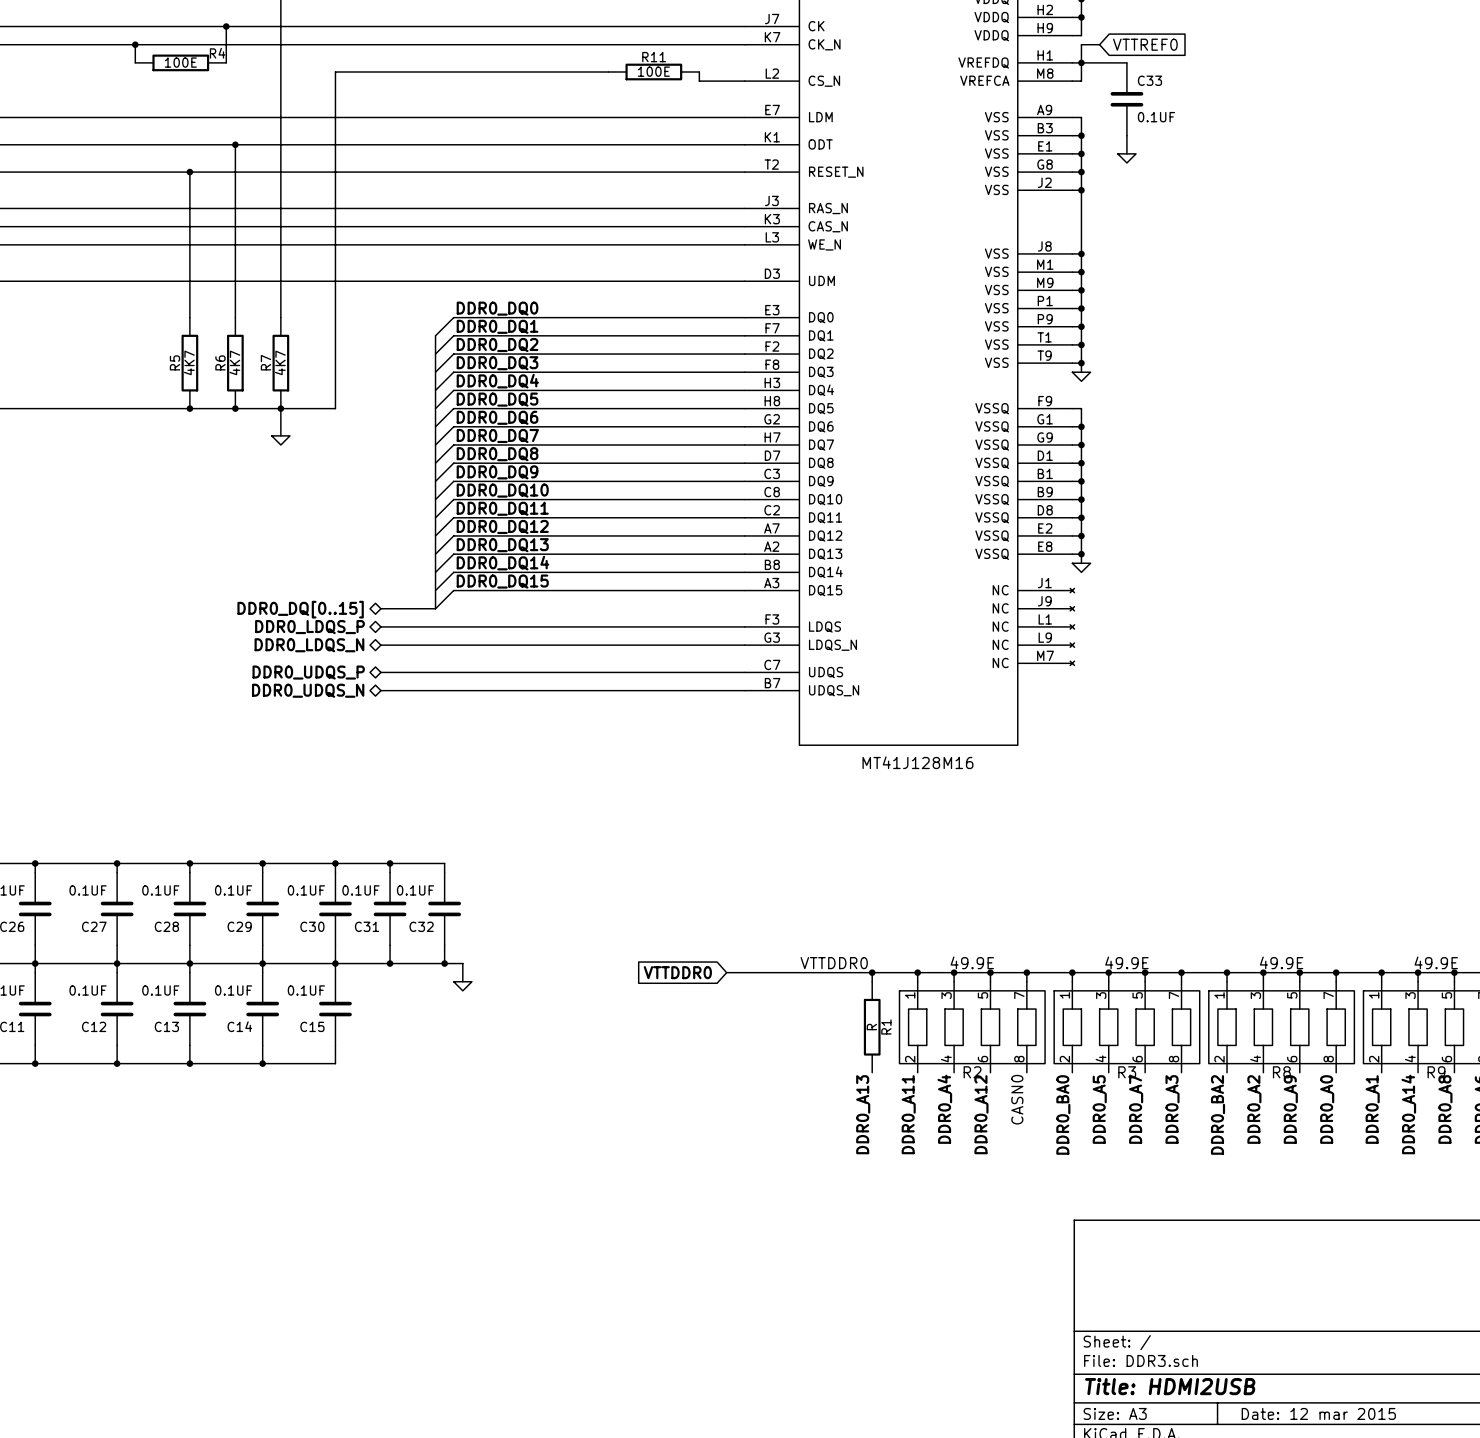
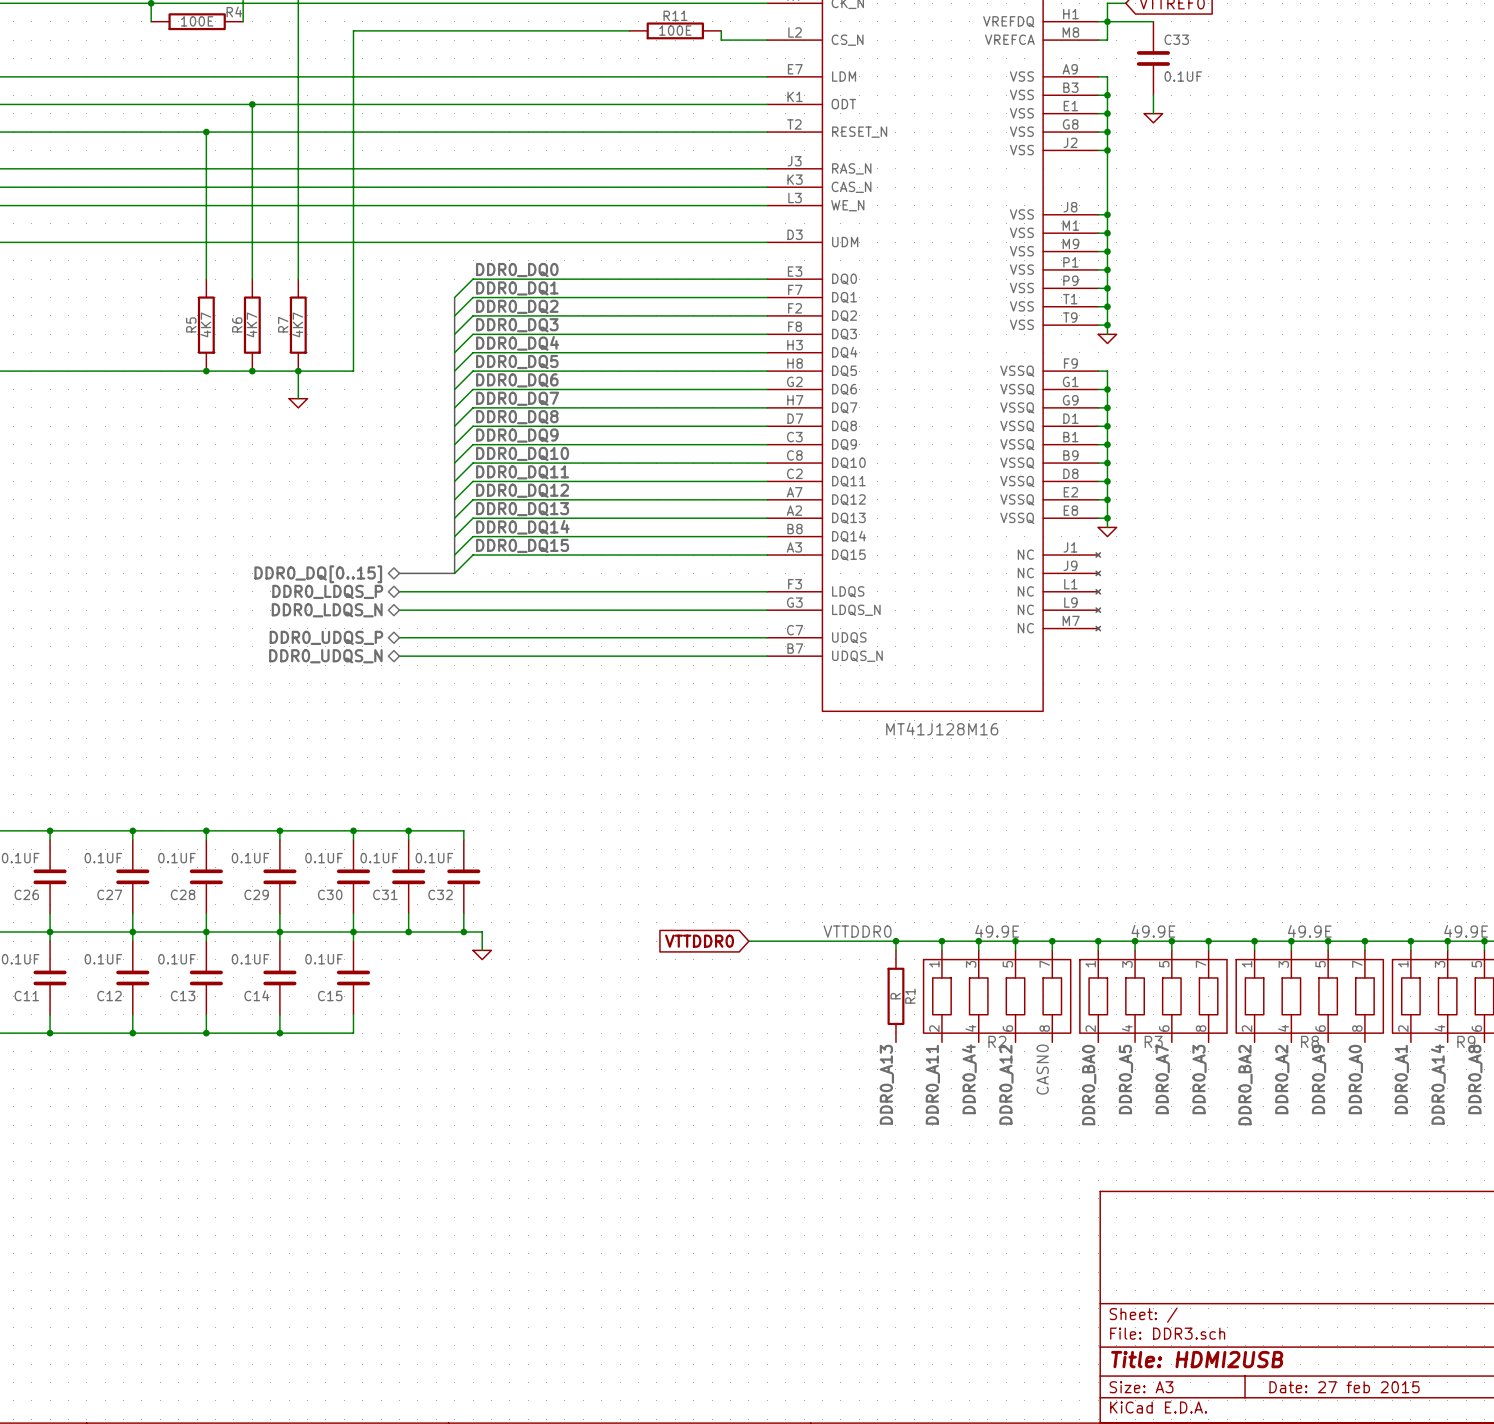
title block: Date: 12 mar 2015 (1318, 1413) -> Date: 27 feb 2015 (1344, 1387)

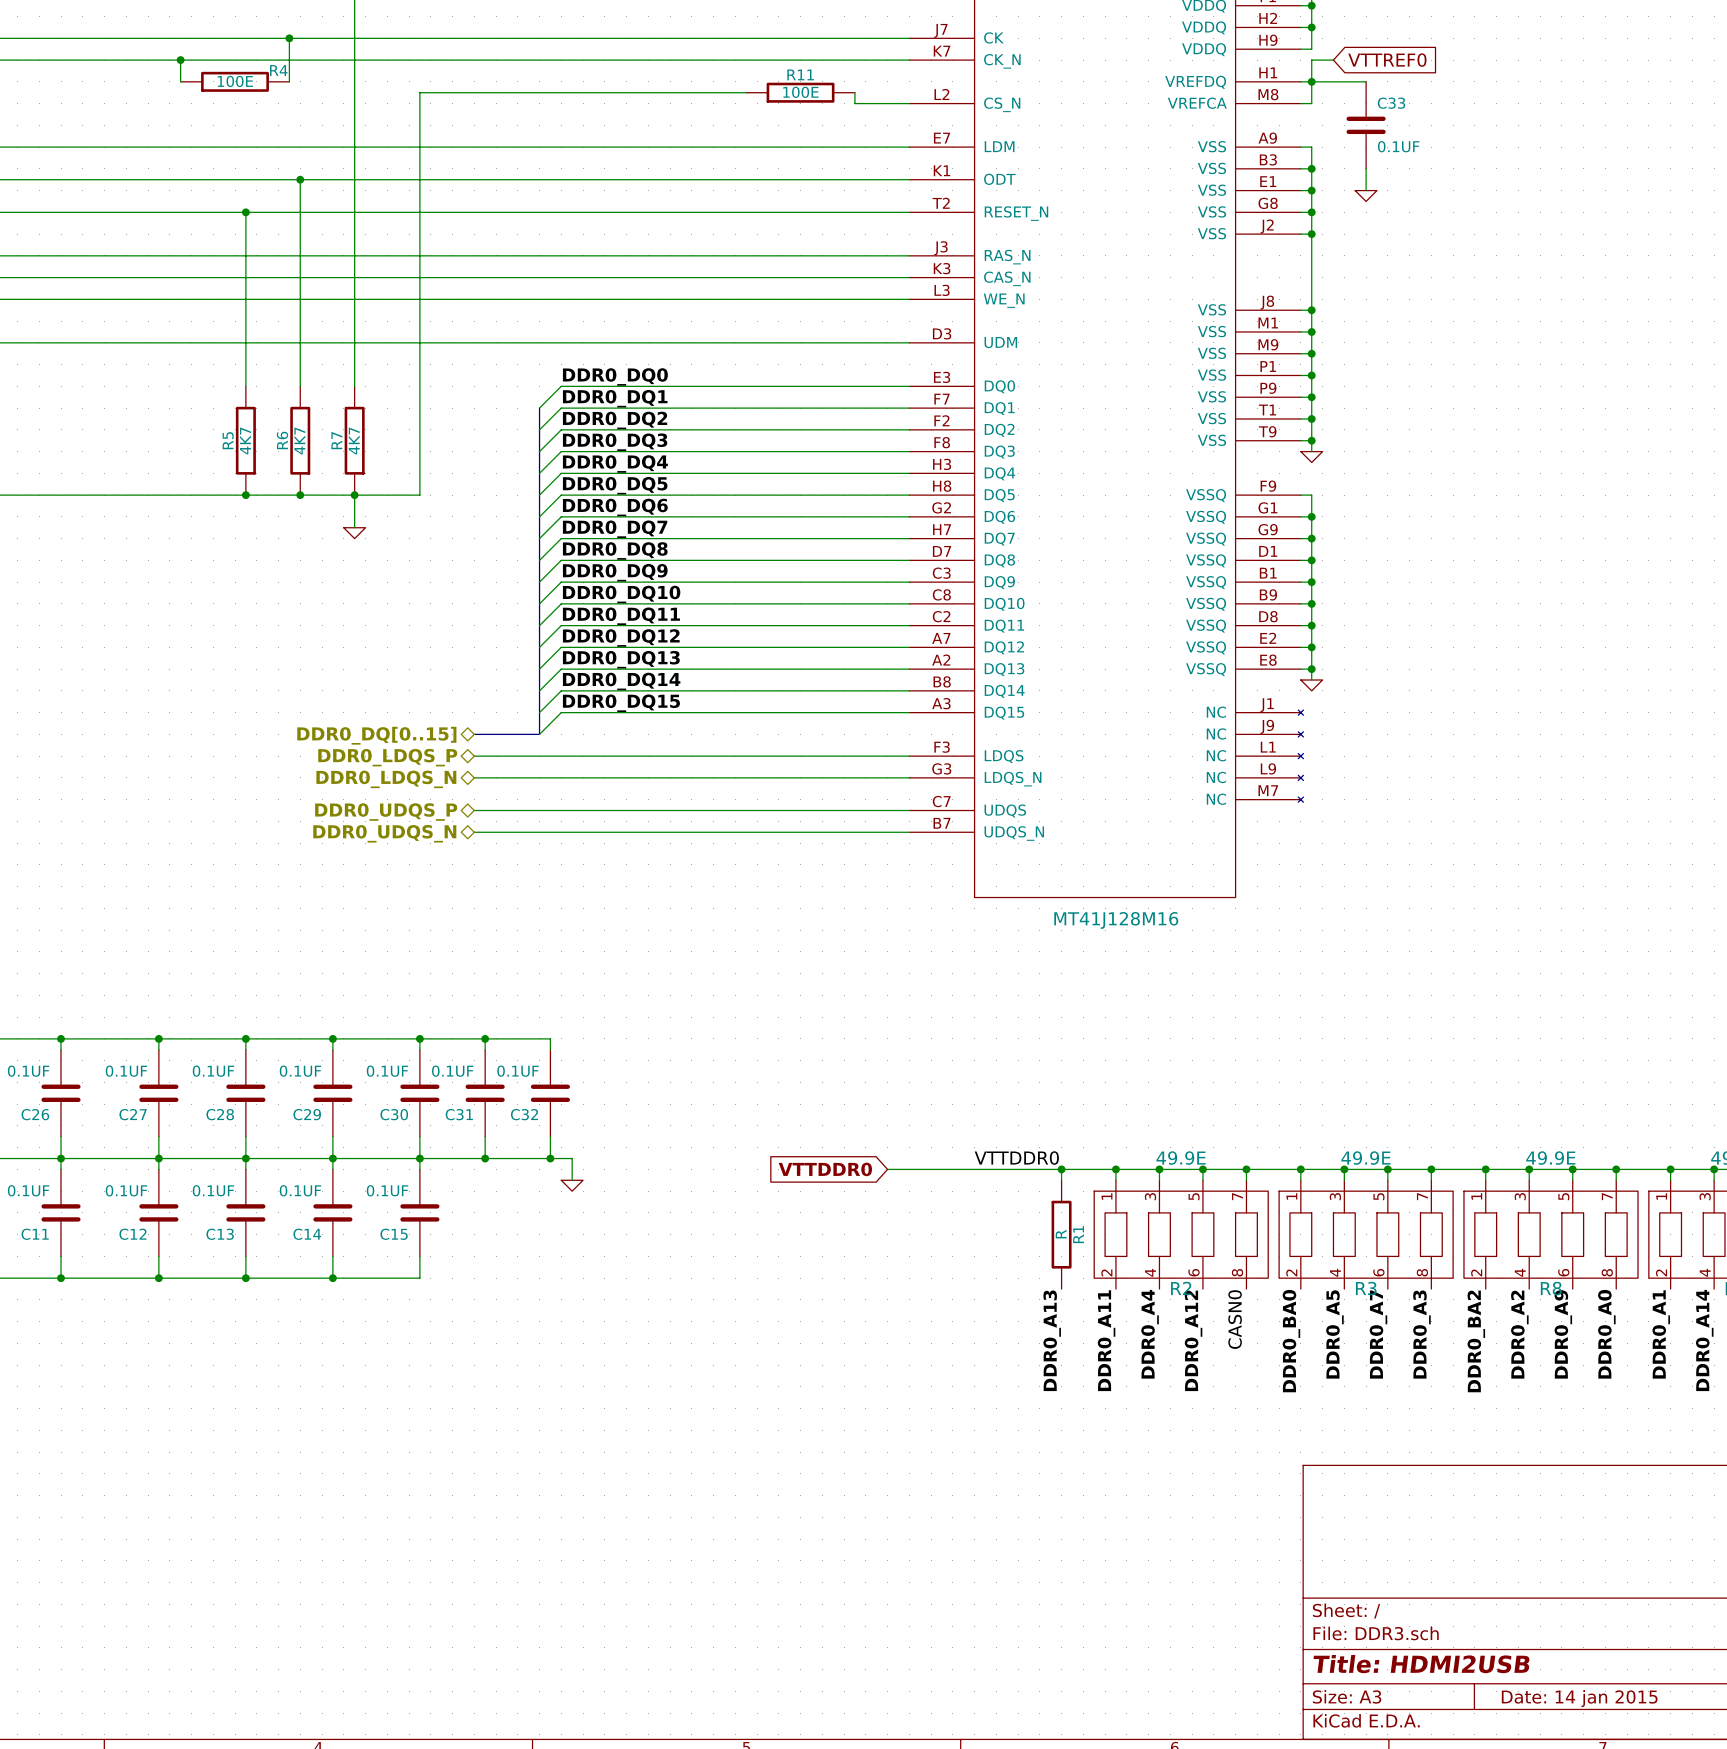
title block: Date: 27 feb 2015 (1344, 1387) -> Date: 14 jan 2015 (1579, 1698)

